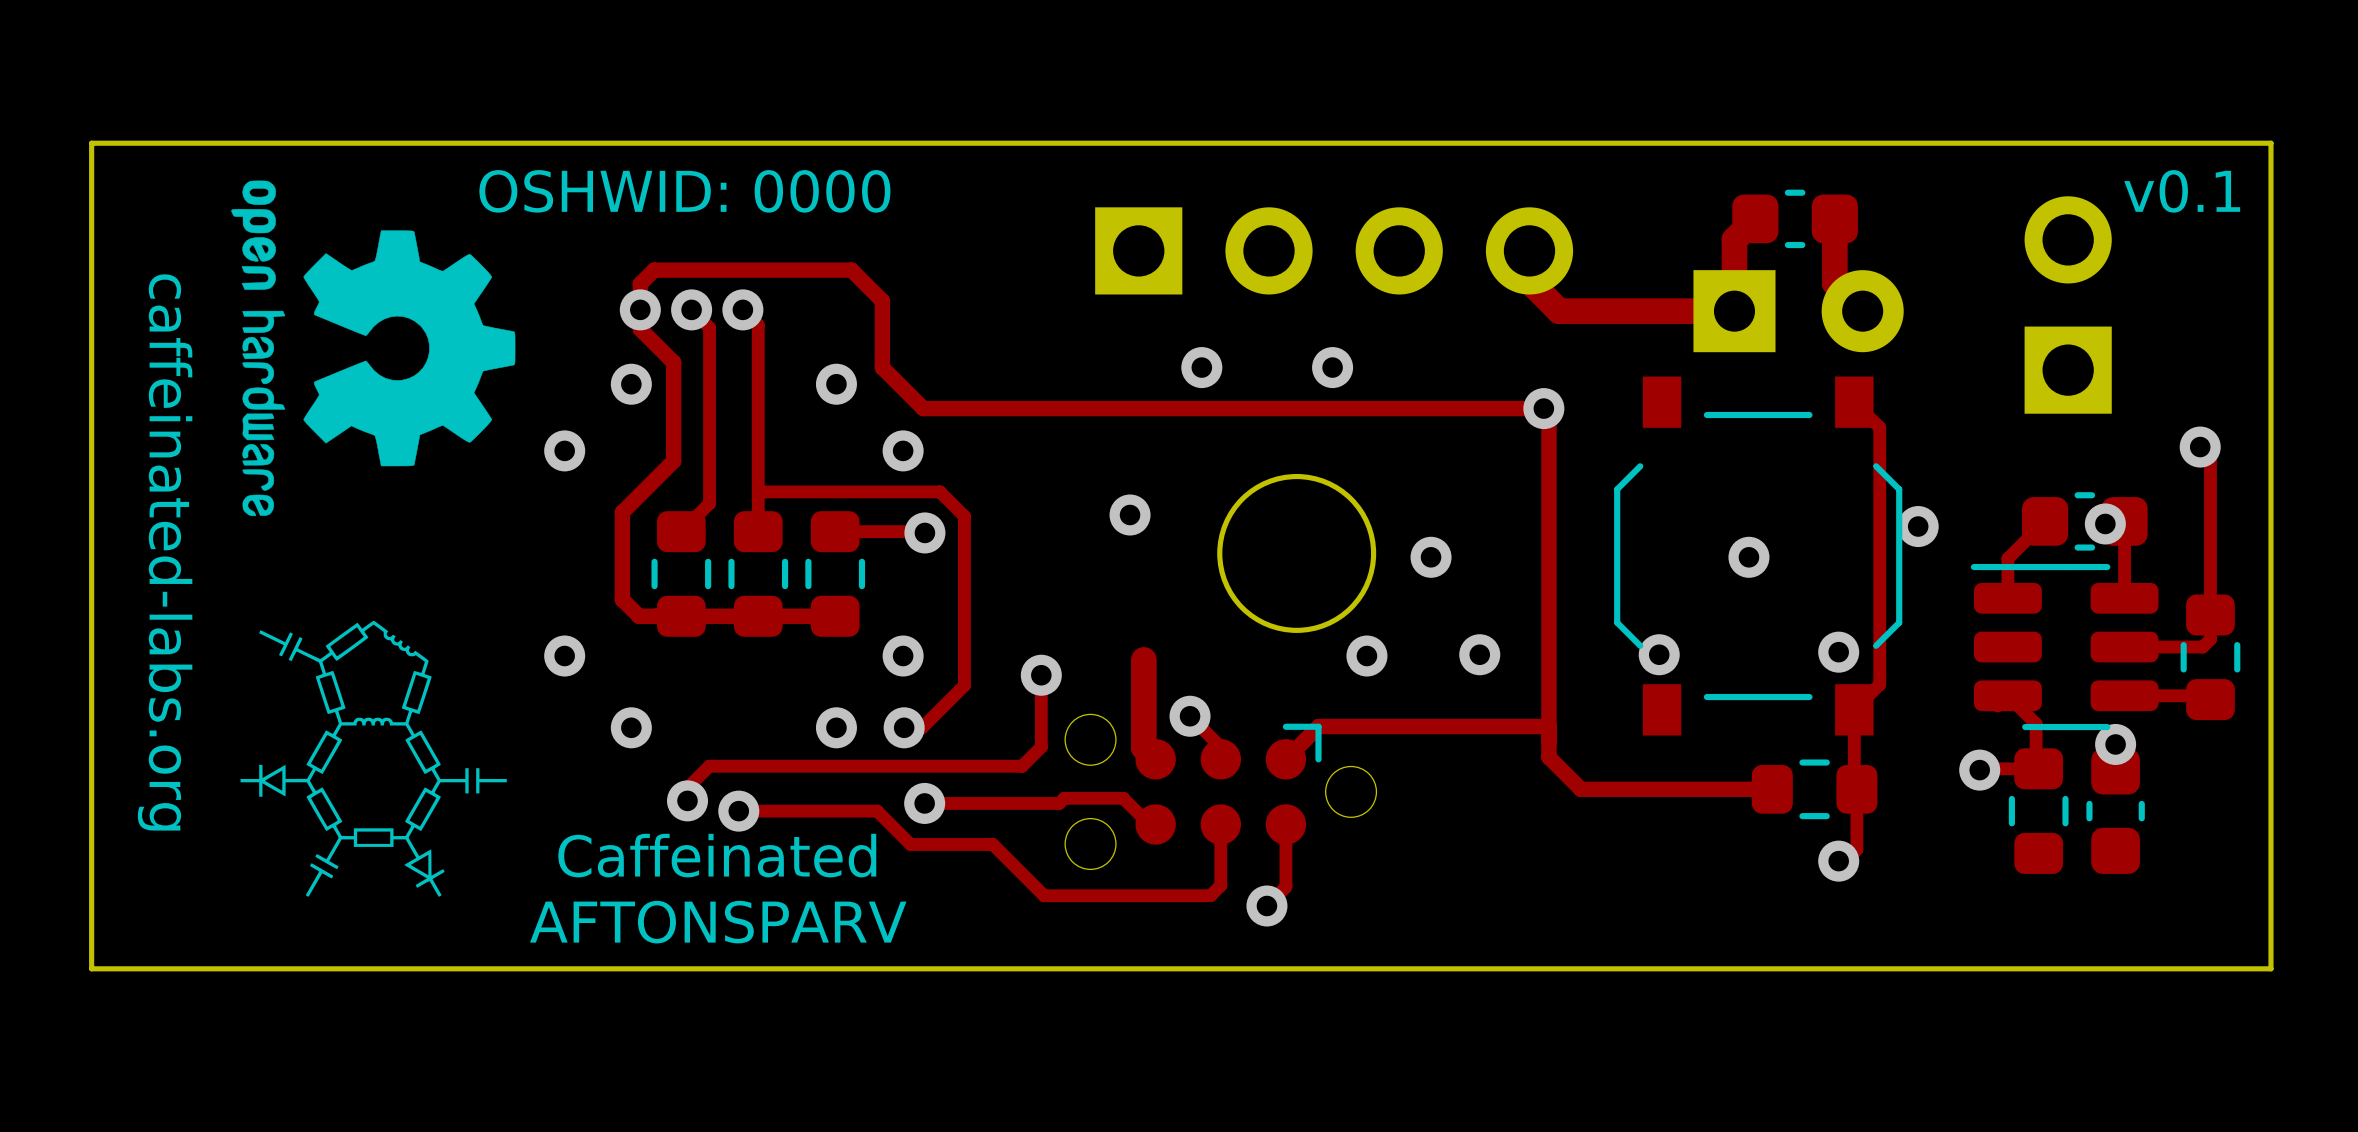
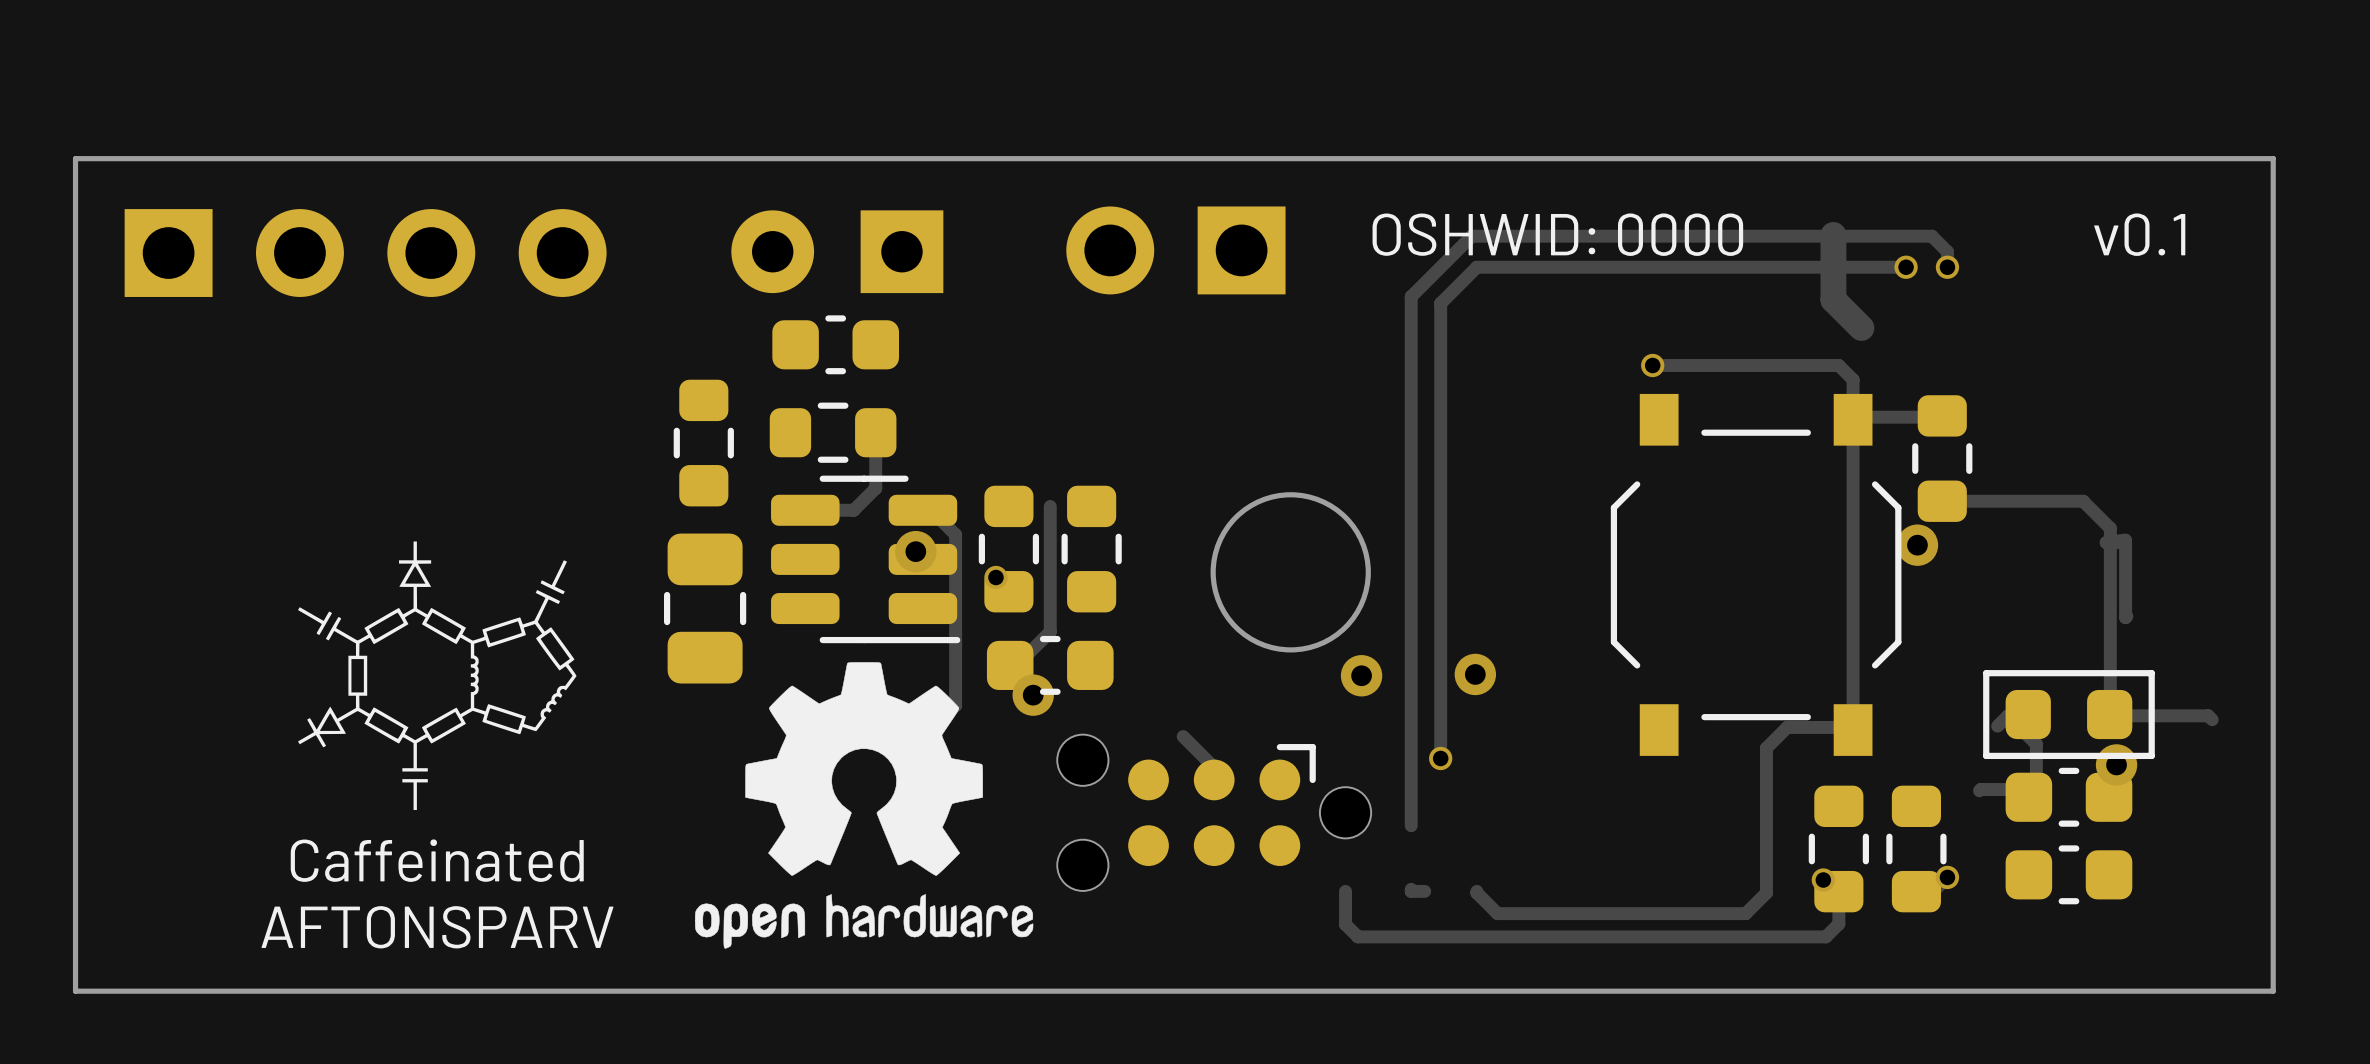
drawing: [231, 180, 516, 517] -> none
text position: OSHWID: 0000 (684, 191) -> OSHWID: 0000 (1557, 234)
text position: v0.1 (2182, 191) -> v0.1 (2139, 234)
track: (1755, 218) (1734, 239) (1734, 311) (1559, 311) (1529, 281) (1529, 250) -> none
part: (1795, 218) -> none
part position: (1334, 250) -> (365, 253)
track: none -> (1906, 267) (1476, 267) (1440, 303) (1440, 758)
via: none -> (1906, 267)
track: none -> (1947, 267) (1947, 251) (1931, 236) (1471, 236) (1411, 296) (1411, 825)
via: none -> (1947, 267)
part rotation: 0° (2068, 305) -> 90° counterclockwise (1175, 250)
part position: (2068, 305) -> (1175, 250)
via: (640, 309) -> none
track: (691, 309) (709, 327) (709, 503) (681, 531) -> none
via: (691, 309) -> none
track: (742, 309) (758, 325) (758, 531) -> none
via: (742, 309) -> none
part rotation: 0° (1798, 311) -> 180° (837, 251)
part position: (1798, 311) -> (837, 251)
part: none -> (835, 344)
track: none -> (1652, 365) (1838, 365) (1853, 379) (1853, 727) (1787, 727) (1766, 748) (1766, 892) (1745, 913) (1497, 913) (1476, 891)
via: none -> (1652, 365)
via: (1201, 367) -> none
via: (1332, 367) -> none
via: (631, 384) -> none
via: (836, 384) -> none
track: none -> (1942, 415) (1853, 417)
track: (1854, 402) (1879, 427) (1879, 684) (1854, 709) (1856, 849) (1845, 861) -> none
via: (1543, 408) -> none
part: none -> (833, 432)
part: none -> (703, 443)
part: none -> (1942, 458)
track: (2200, 447) (2210, 457) (2210, 639) (2202, 647) (2124, 647) -> none
via: (2200, 447) -> none
via: (564, 450) -> none
via: (903, 450) -> none
track: none -> (1942, 501) (2083, 501) (2110, 528) (2110, 714)
track: none -> (1050, 506) (1050, 631) (1016, 665) (1010, 665)
track: (758, 491) (815, 491) -> none
track: (863, 491) (931, 491) -> (853, 510) (875, 488) (875, 432)
via: (1130, 514) -> none
track: (2045, 521) (2007, 558) (2007, 598) -> none
part: (2084, 521) -> none
drawing: none -> [298, 541, 577, 811]
via: (2105, 523) -> none
part: none -> (1008, 549)
part: none -> (1091, 549)
track: (835, 531) (924, 532) -> none
part: none -> (865, 559)
text: caffeinated-labs.org (165, 552) -> none
via: (1431, 557) -> none
via: (1748, 557) -> none
via: none -> (995, 577)
part footprint: [1970, 563, 2159, 731] -> [1983, 670, 2155, 760]
part: (681, 573) -> none
part: (758, 573) -> none
part: (835, 573) -> none
part: none -> (705, 608)
track: (681, 616) (835, 616) (639, 616) (622, 599) (622, 512) (673, 461) (673, 362) (640, 329) (640, 283) (654, 270) (851, 270) (882, 300) (882, 367) (923, 408) (1543, 408) (1548, 413) (1548, 757) (1581, 789) (1772, 789) -> none
drawing: [240, 620, 507, 897] -> none
drawing: none -> [694, 662, 1034, 949]
part: none -> (1050, 665)
via: (1838, 652) -> none
via: (1659, 654) -> none
via: (564, 656) -> none
via: (903, 656) -> none
part: (2210, 657) -> none
track: (1143, 659) (1143, 747) (1155, 759) -> none
track: (1041, 675) (1041, 747) (1022, 766) (709, 766) (687, 788) (687, 800) -> none
via: (1190, 716) -> none
track: (1548, 726) (1318, 726) (1285, 759) -> none
via: (631, 727) -> none
via: (836, 727) -> none
via: (904, 727) -> none
via: none -> (1440, 758)
via: (1979, 770) -> none
part: none -> (2068, 797)
part rotation: 0° (1814, 789) -> 90° clockwise (1838, 848)
via: (687, 800) -> none
track: (924, 803) (1059, 803) (1064, 798) (1123, 798) (1149, 824) (1155, 824) (1155, 820) -> none
via: (924, 803) -> none
track: (738, 811) (877, 811) (910, 844) (992, 844) (1044, 895) (1210, 895) (1220, 885) (1220, 824) -> none
via: (738, 811) -> none
part position: (2038, 811) -> (1916, 848)
part: (2115, 811) -> none
track: (1285, 824) (1285, 887) (1266, 905) -> none
via size: [1818, 840, 1860, 882] -> [1811, 868, 1835, 892]
part: none -> (2068, 874)
text position: Caffeinated (717, 855) -> Caffeinated (437, 860)
via: none -> (1947, 877)
track: none -> (1411, 889) (1411, 891) (1424, 891)
track: none -> (1345, 891) (1345, 924) (1357, 936) (1825, 936) (1838, 923) (1838, 891)
via: (1266, 905) -> none
text position: AFTONSPARV (718, 922) -> AFTONSPARV (437, 927)

